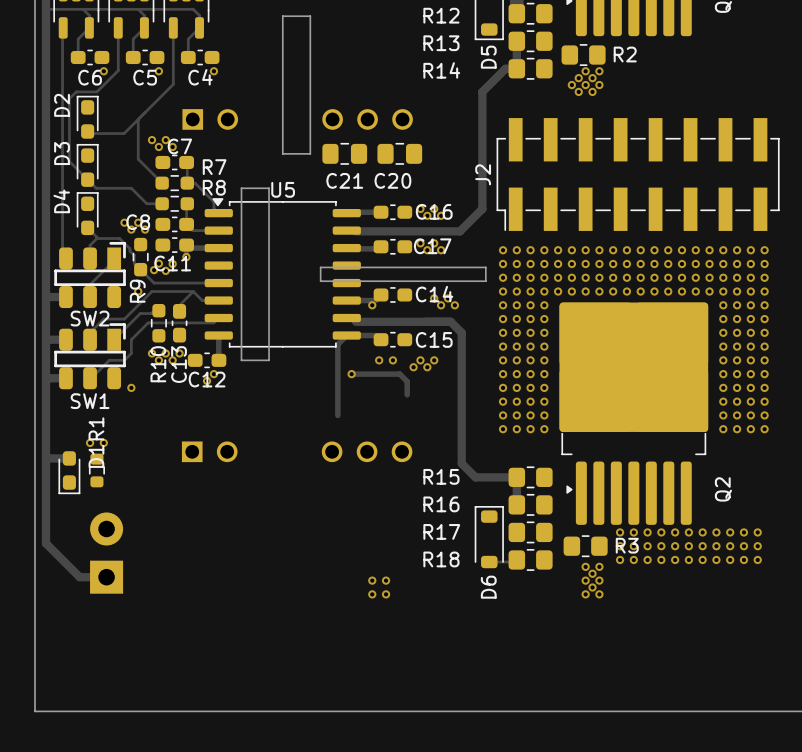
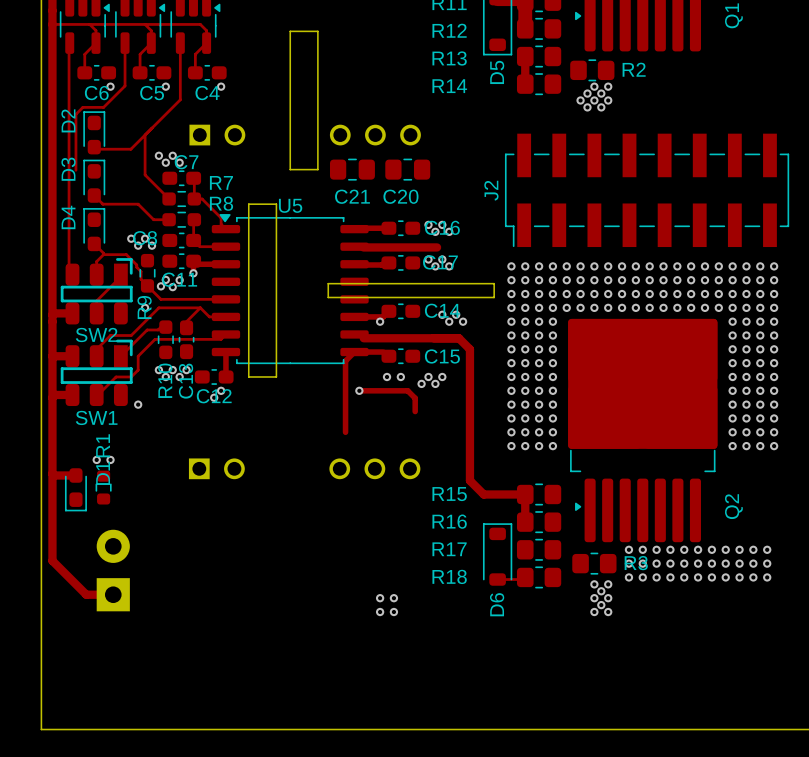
track: (516, 68) (505, 68) (482, 91) (482, 208) (459, 231) (428, 231) -> none
track: (69, 154) (69, 161) (87, 179) -> none

